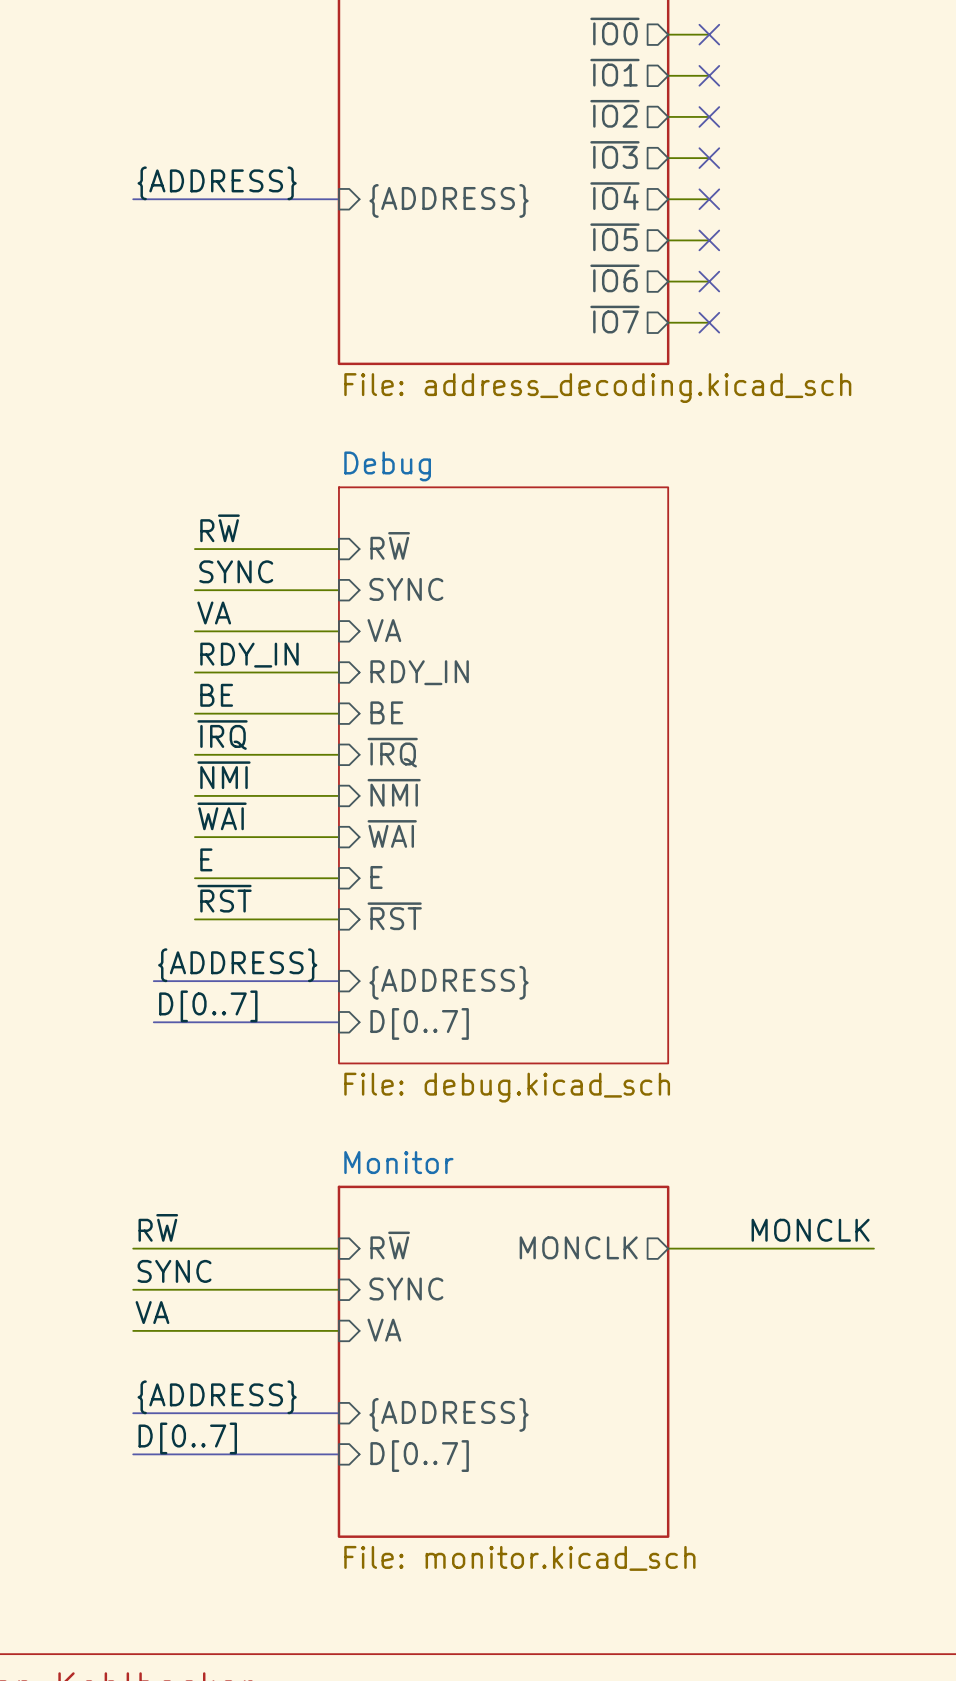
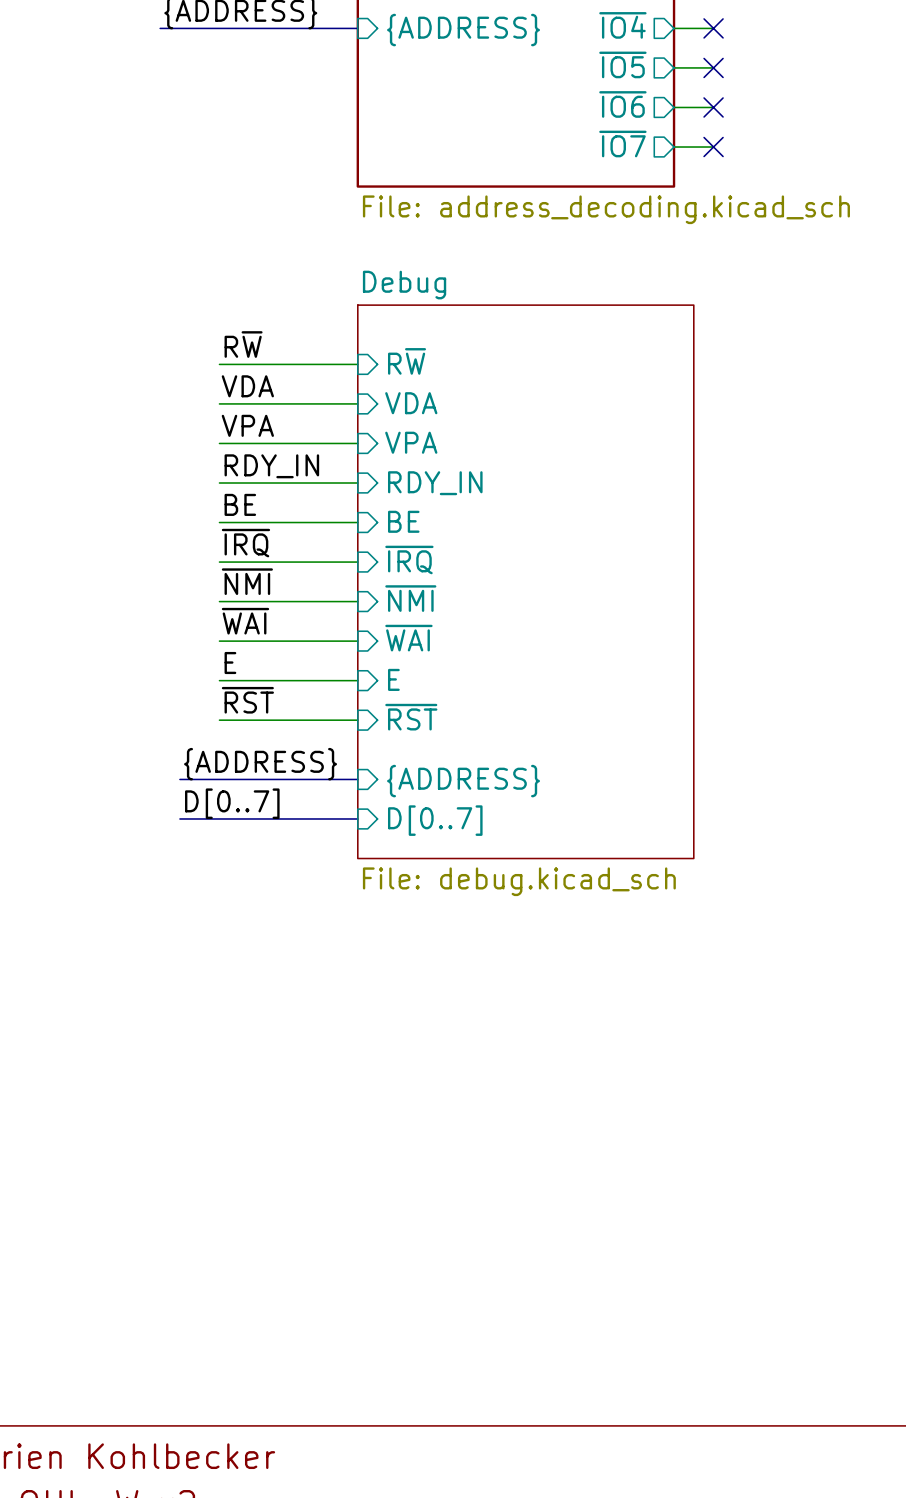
sheet Debug shape: [338, 487, 669, 1064] -> [357, 305, 694, 859]
label: SYNC (236, 571) -> VDA (247, 386)
sheet pin: SYNC (406, 589) -> VDA (411, 403)
label: VA (214, 612) -> VPA (247, 425)
sheet pin: VA (384, 630) -> VPA (411, 442)
label: R~{W} (158, 1227) -> none
label: MONCLK (810, 1230) -> none
sheet pin: R~{W} (390, 1245) -> none
sheet pin: MONCLK (578, 1247) -> none
wire: (133, 1248) (338, 1248) -> none
wire: (668, 1248) (873, 1248) -> none
label: SYNC (174, 1271) -> none
wire: (133, 1289) (338, 1289) -> none
sheet pin: SYNC (406, 1289) -> none
label: VA (152, 1312) -> none
wire: (133, 1330) (338, 1330) -> none
sheet pin: VA (384, 1330) -> none
sheet Monitor: File: monitor.kicad_sch (503, 1361) -> none
label: {ADDRESS} (217, 1397) -> none
bus: (133, 1413) (338, 1413) -> none
sheet pin: {ADDRESS} (449, 1414) -> none
label: D[0..7] (187, 1438) -> none
bus: (133, 1454) (338, 1454) -> none
sheet pin: D[0..7] (419, 1456) -> none

